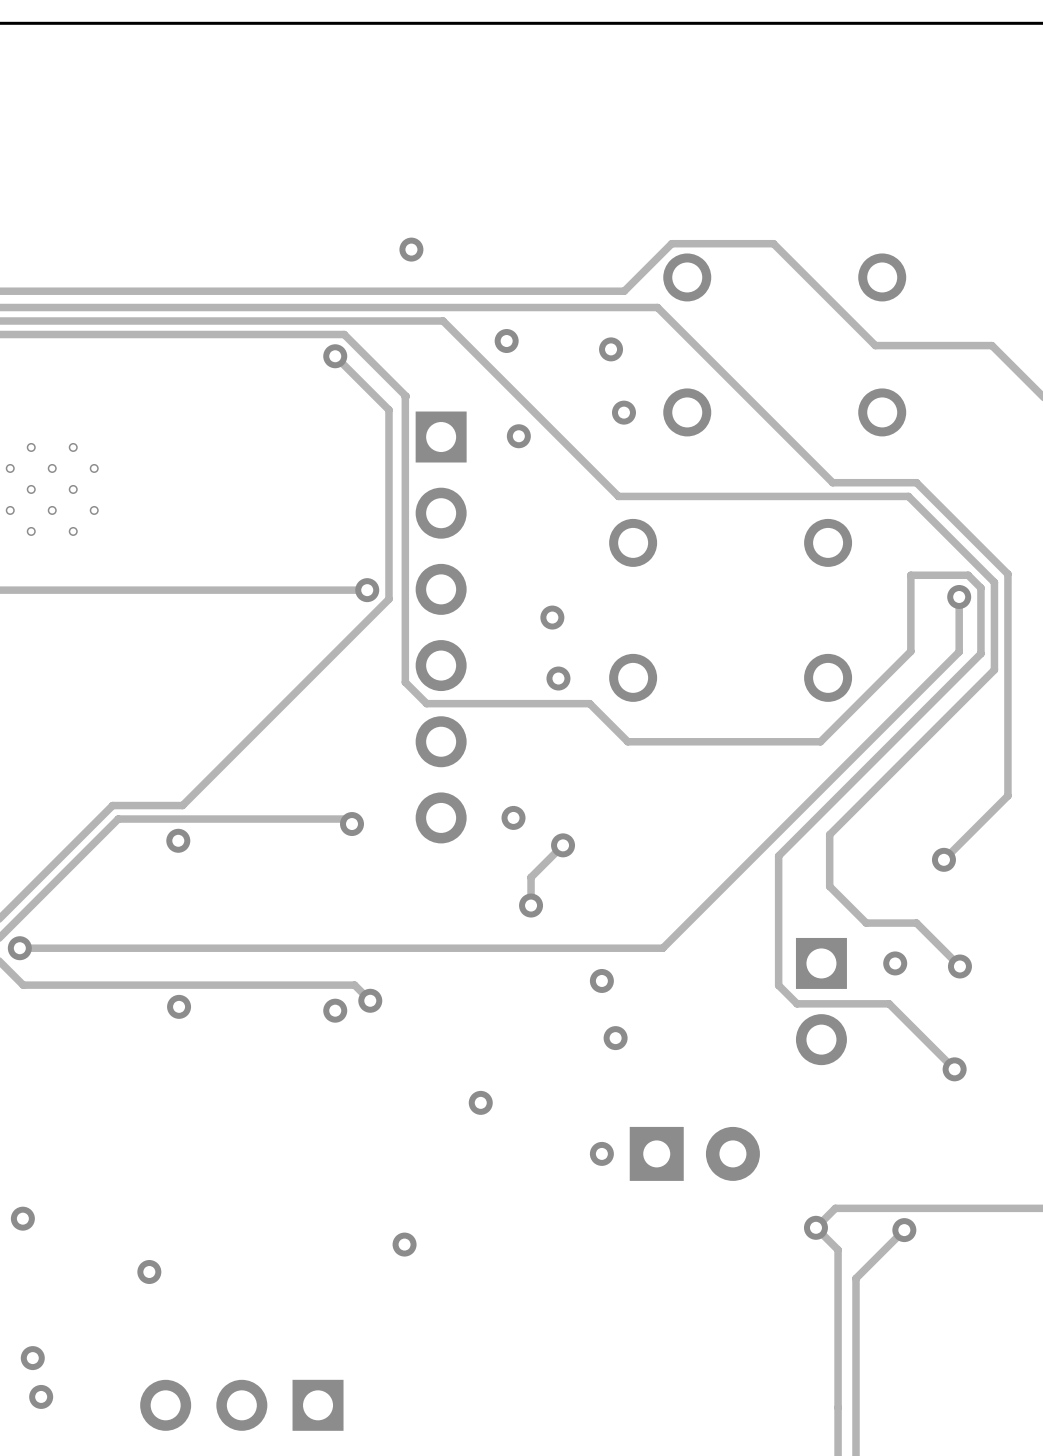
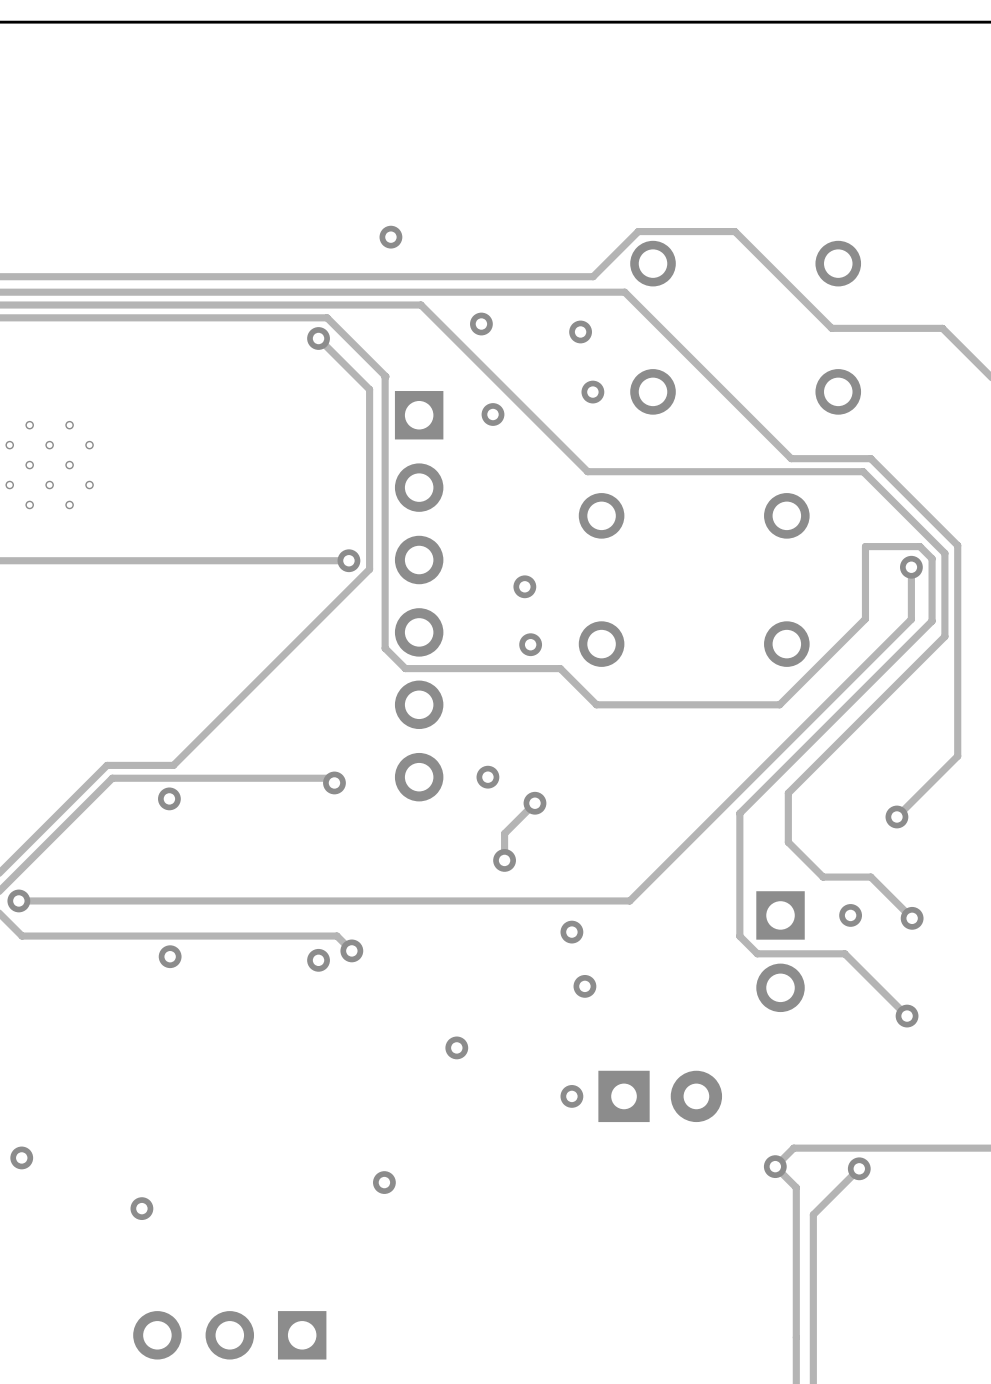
via: (32, 1358) -> none
via: (41, 1396) -> none

